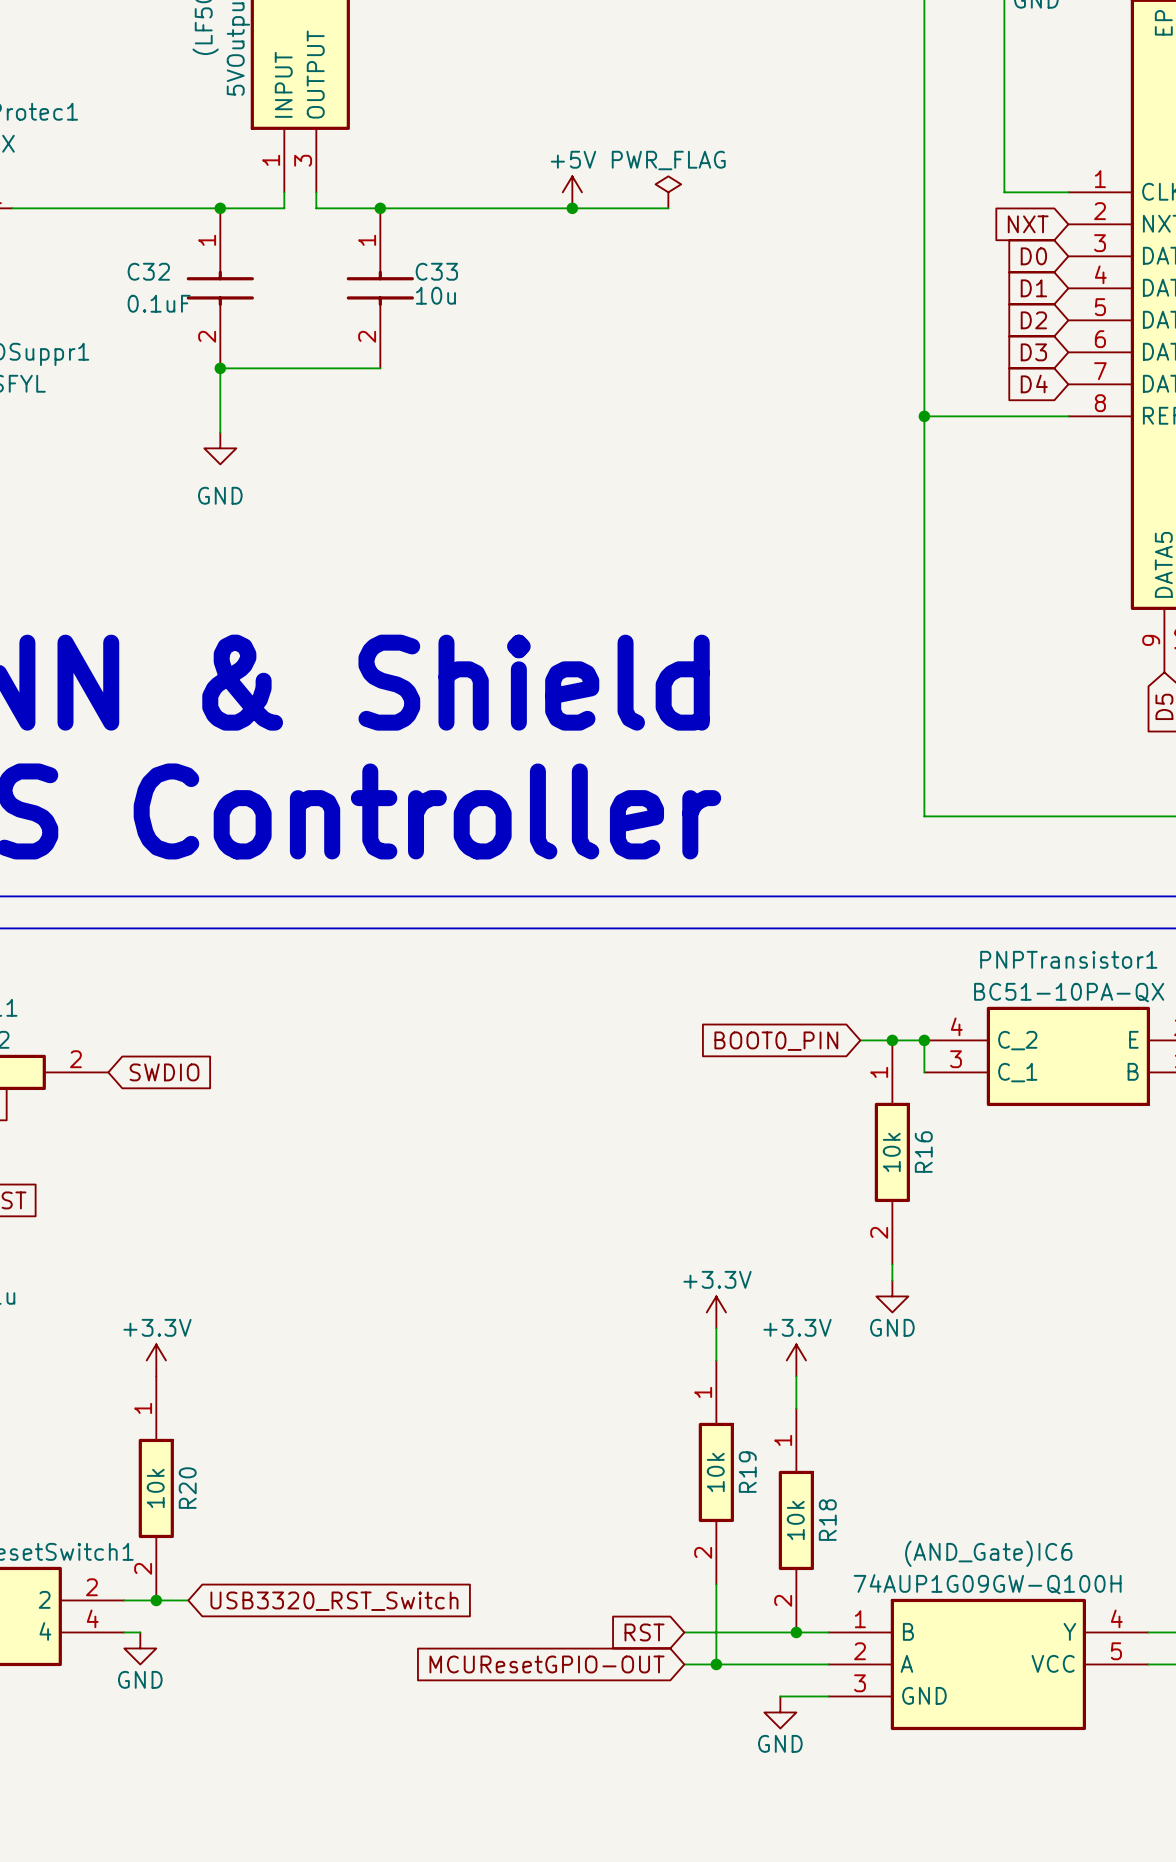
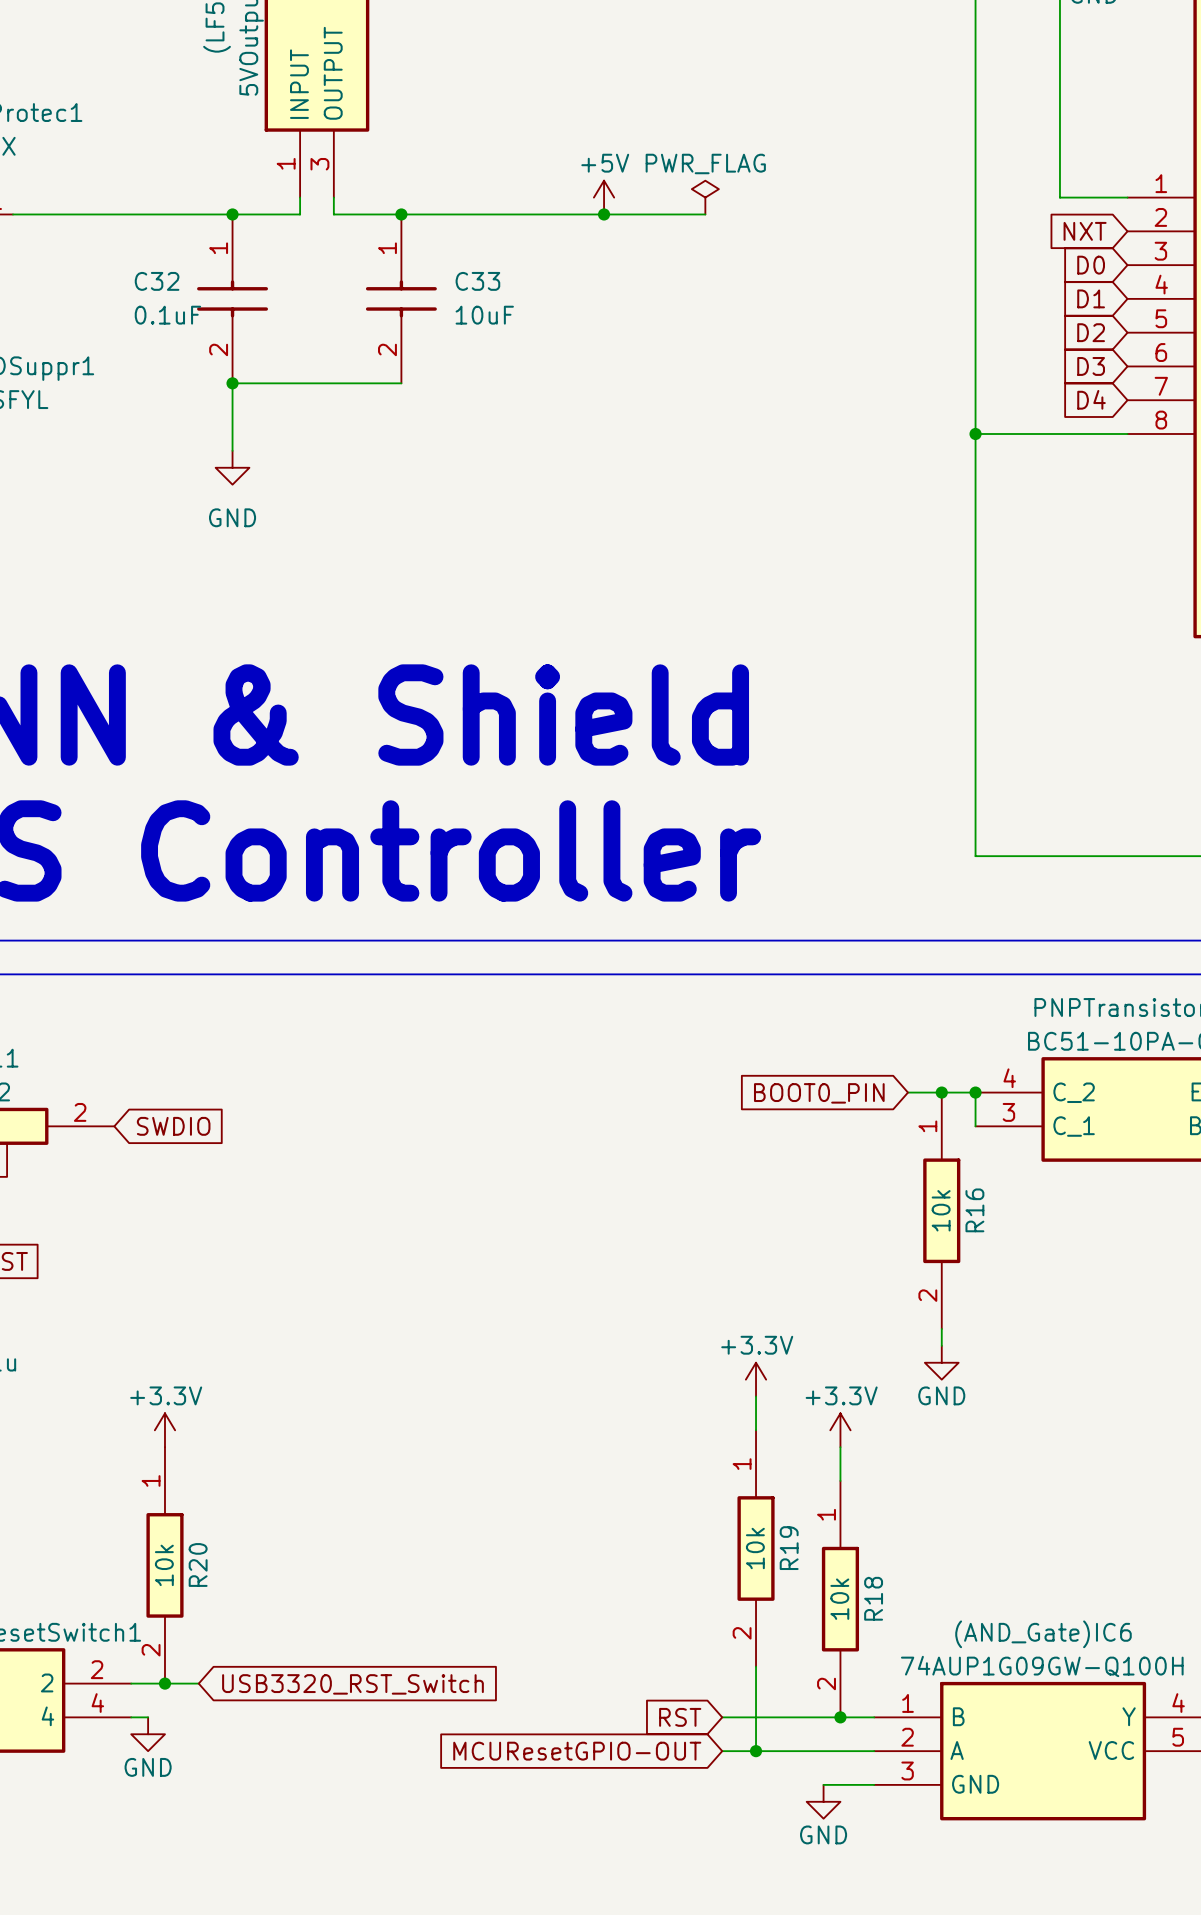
C33 name position: C33 (436, 271) -> C33 (477, 281)
C33 text: 10u (435, 295) -> none
C33 value: none -> 10uF (484, 315)

